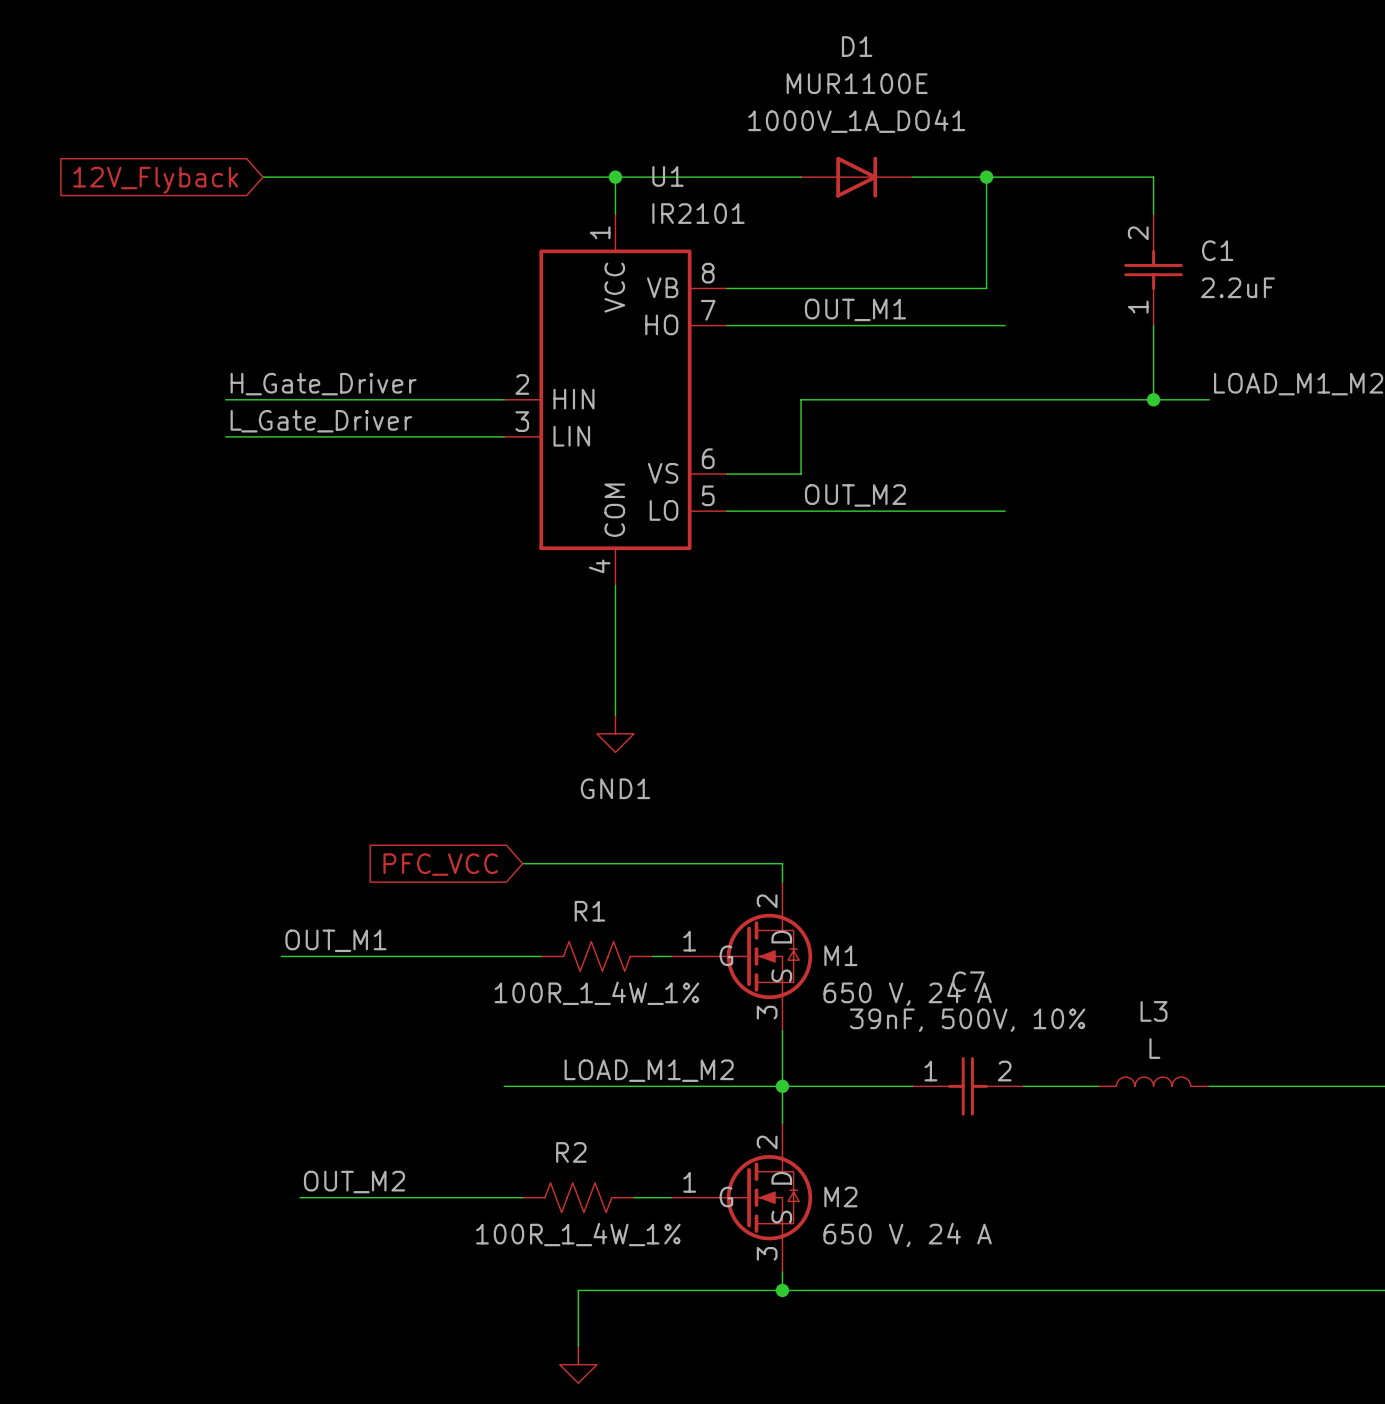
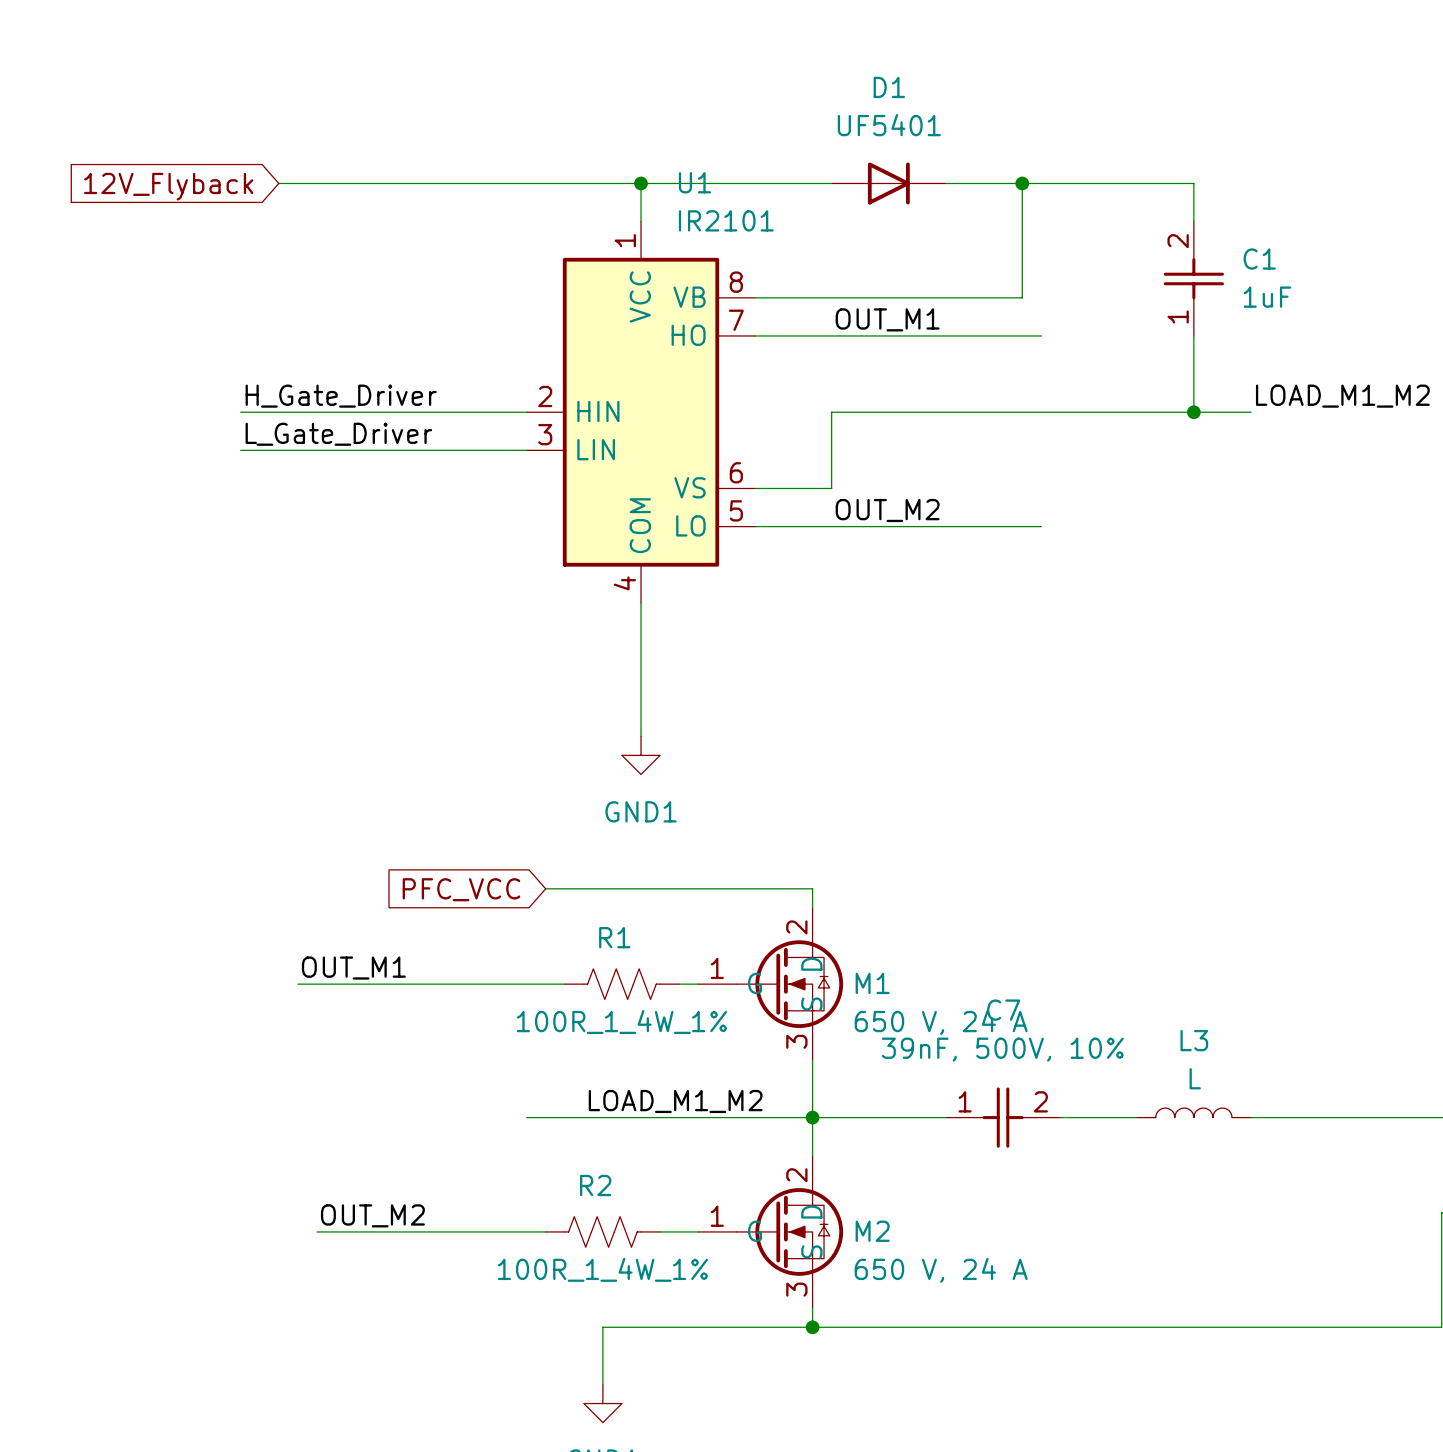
D1 name position: D1 (857, 46) -> D1 (889, 87)
D1 value: MUR1100E (857, 83) -> UF5401 (889, 125)
D1 text: 1000V_1A_DO41 (856, 121) -> none
C1 value: 2.2uF (1238, 287) -> 1uF (1267, 297)

